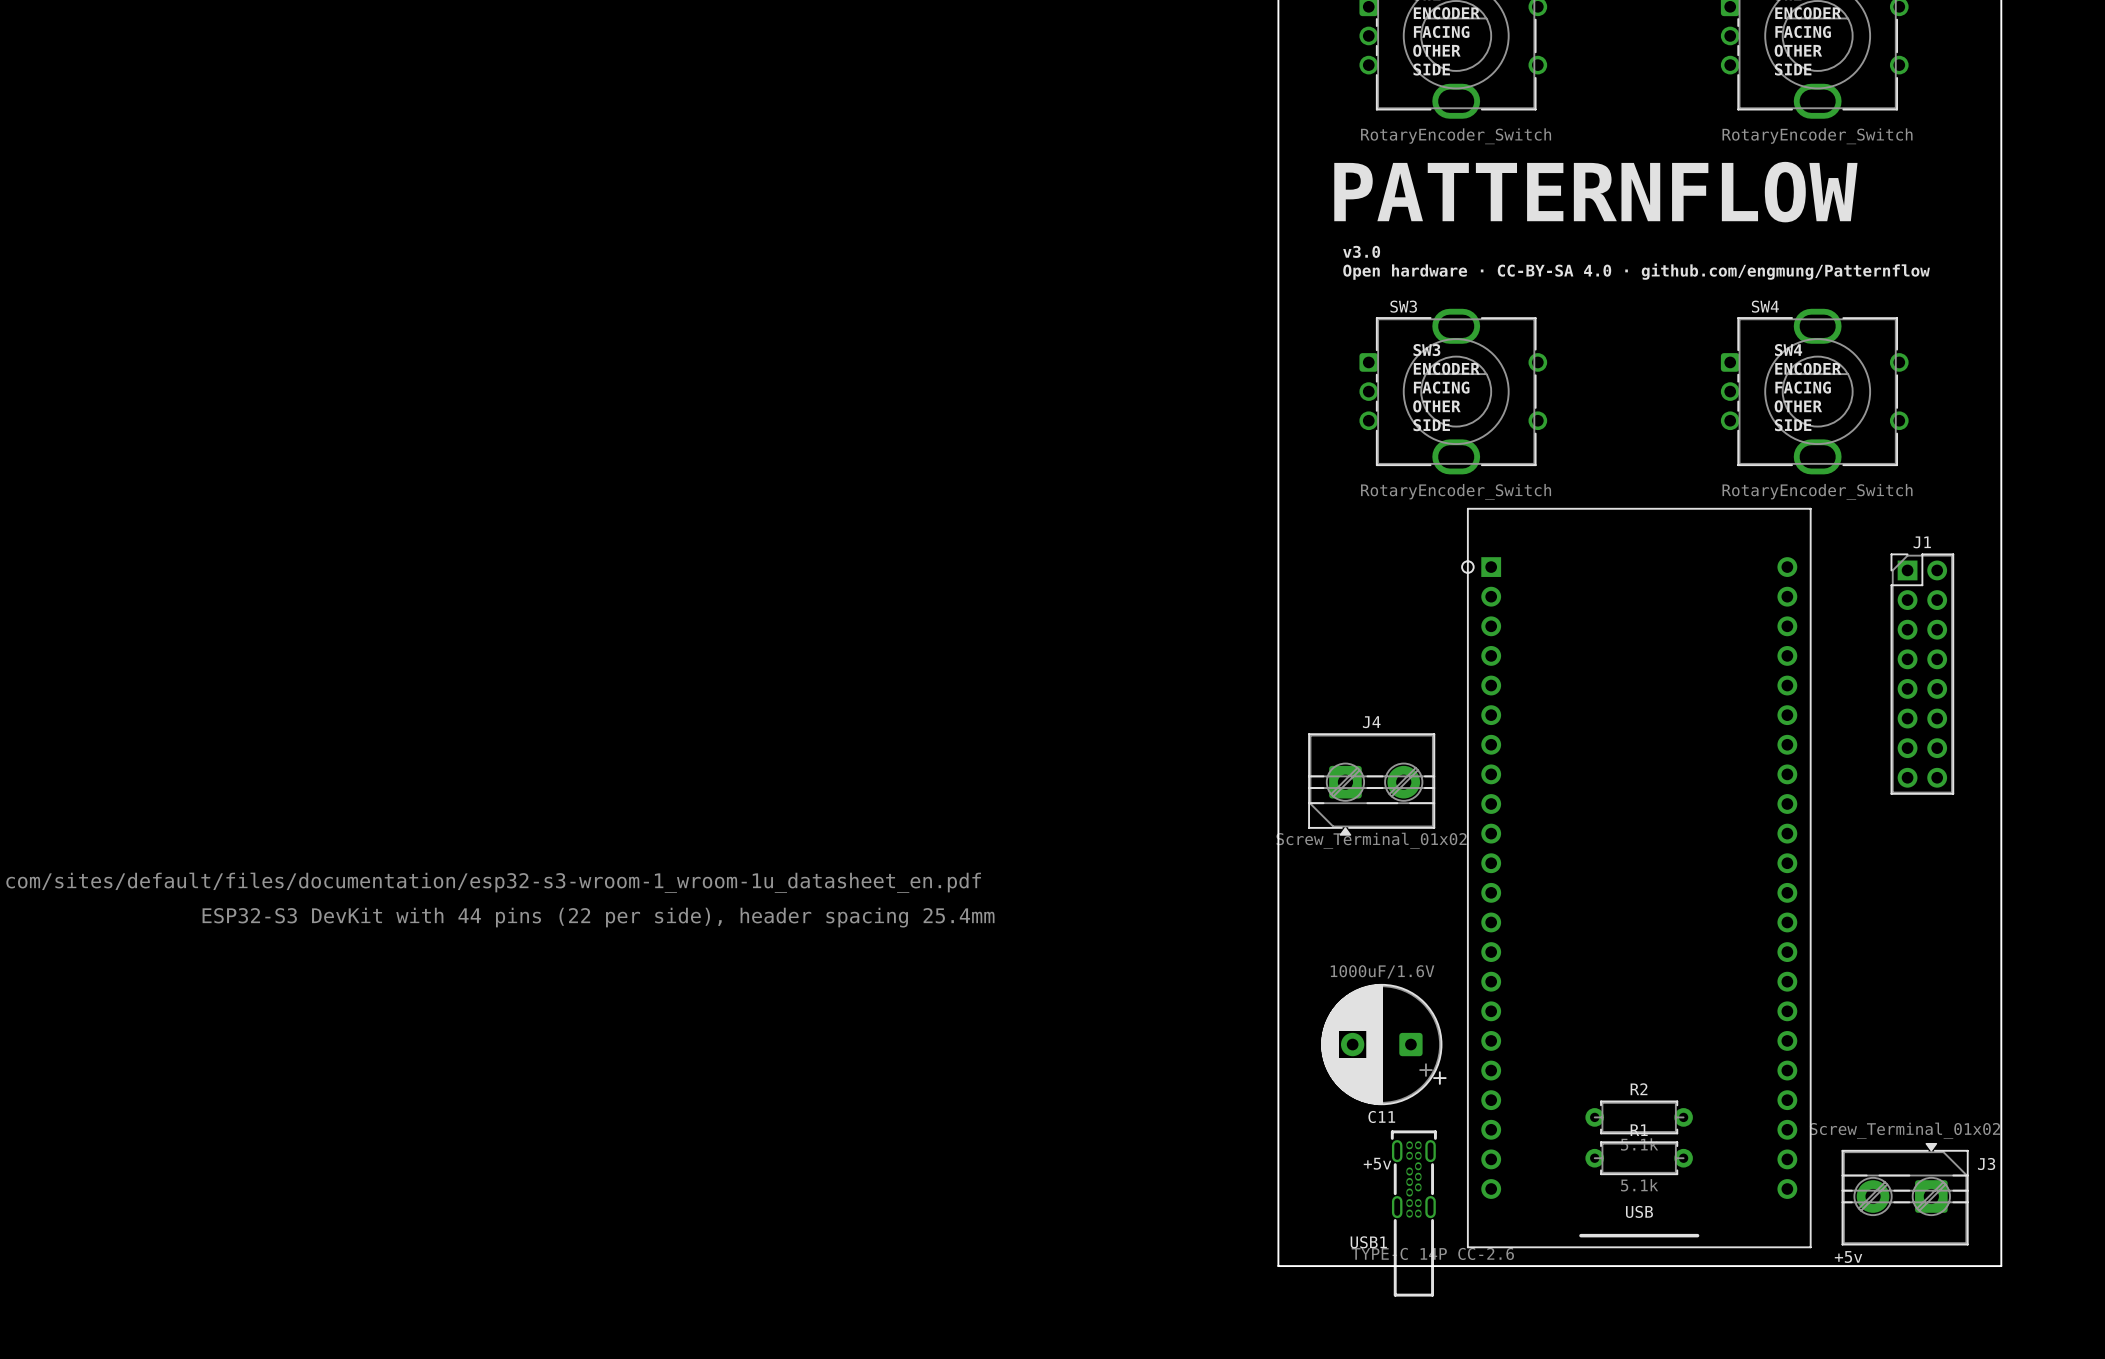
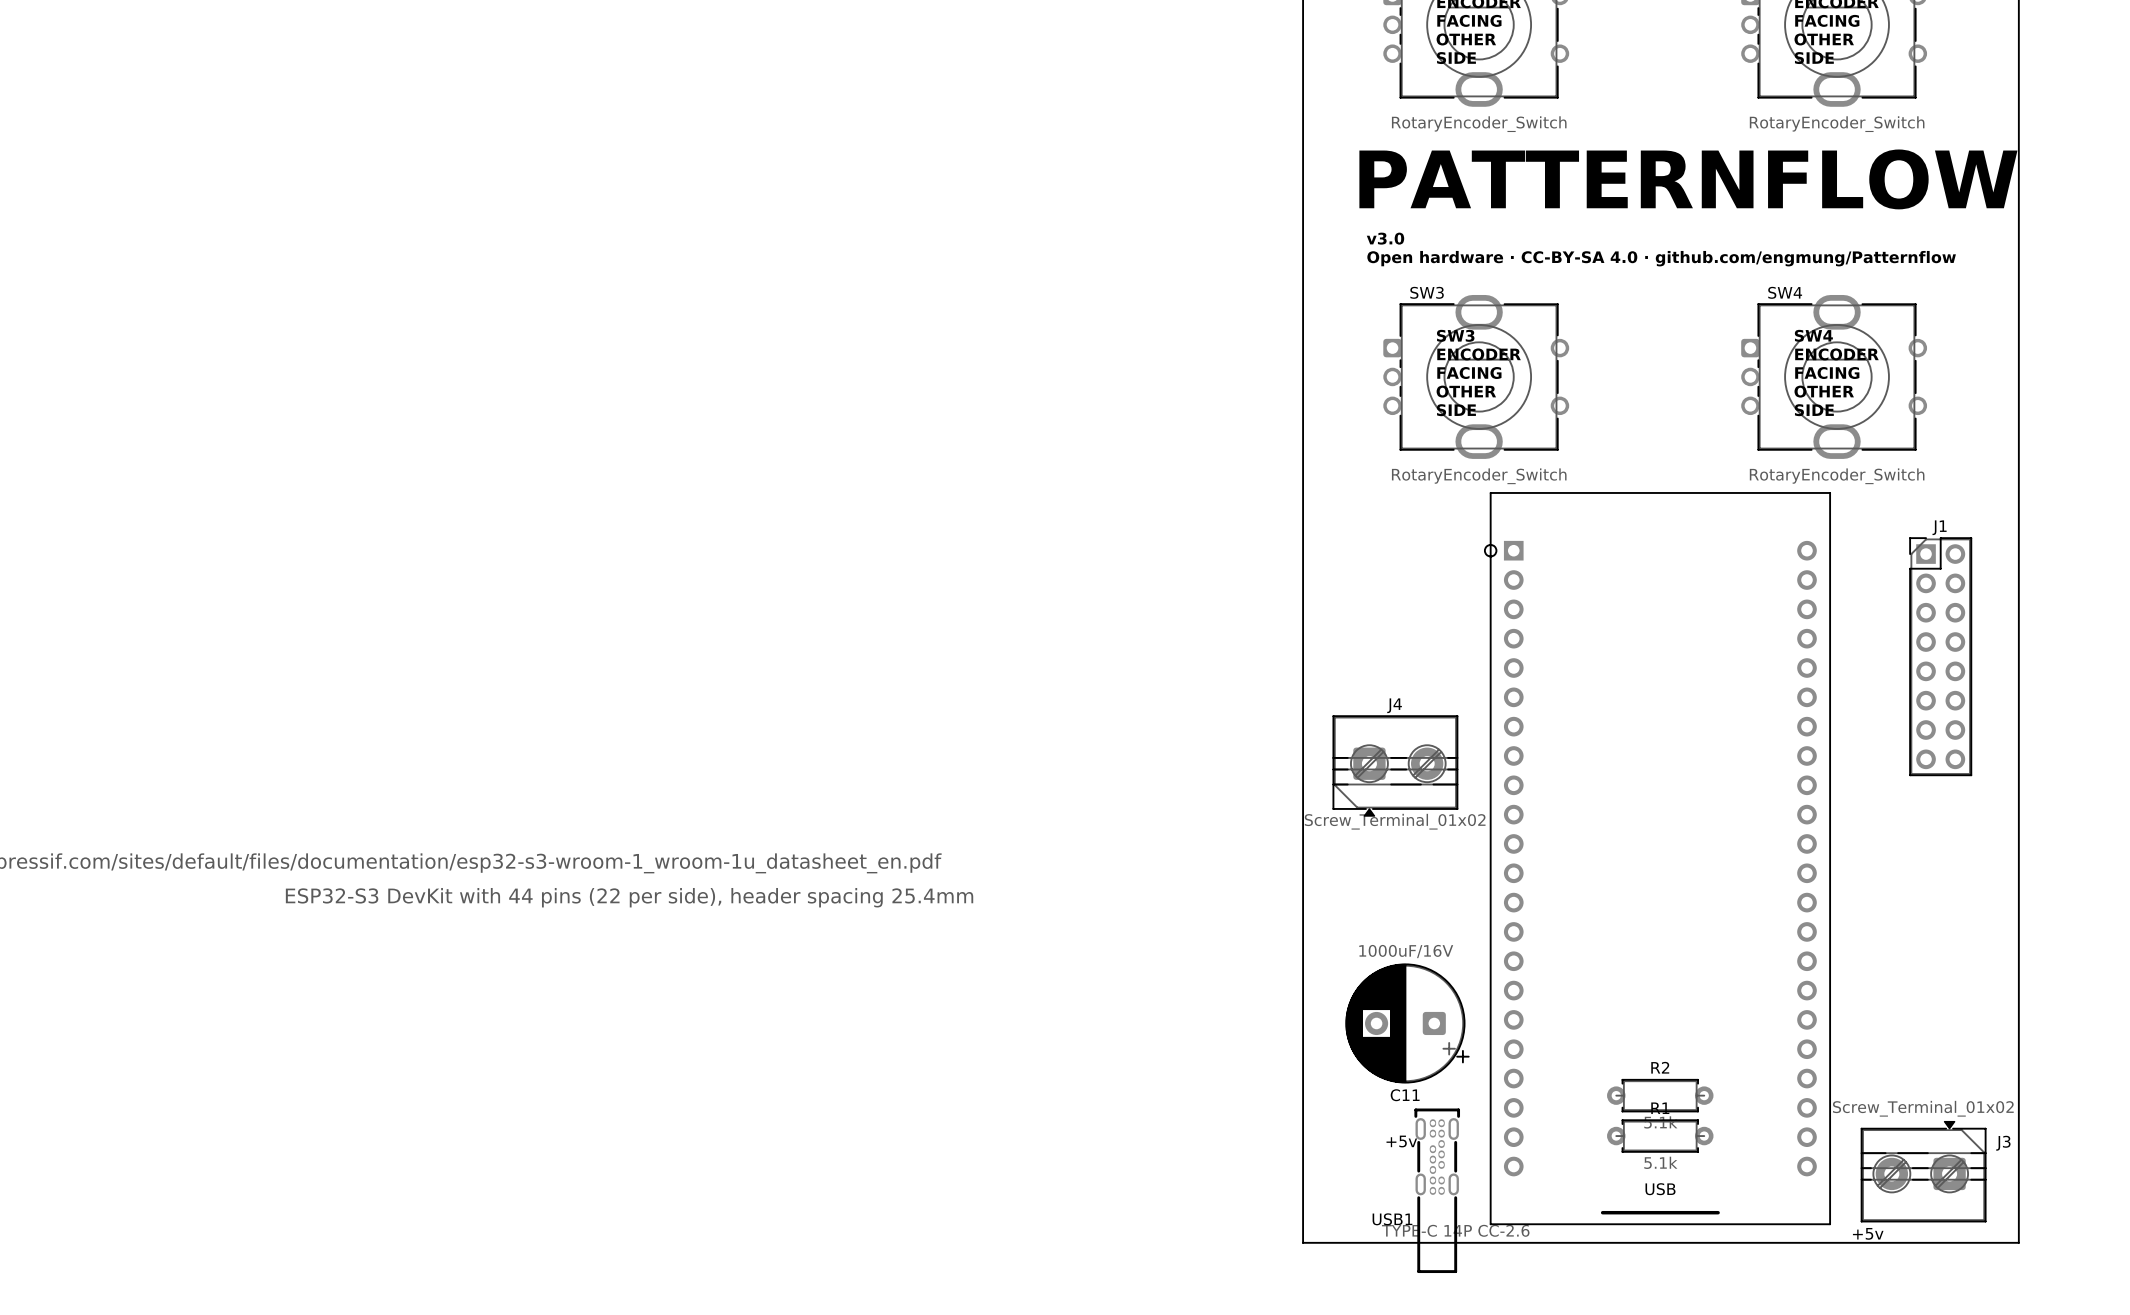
C11 value: 1000uF/1.6V (1382, 971) -> 1000uF/16V (1406, 951)

